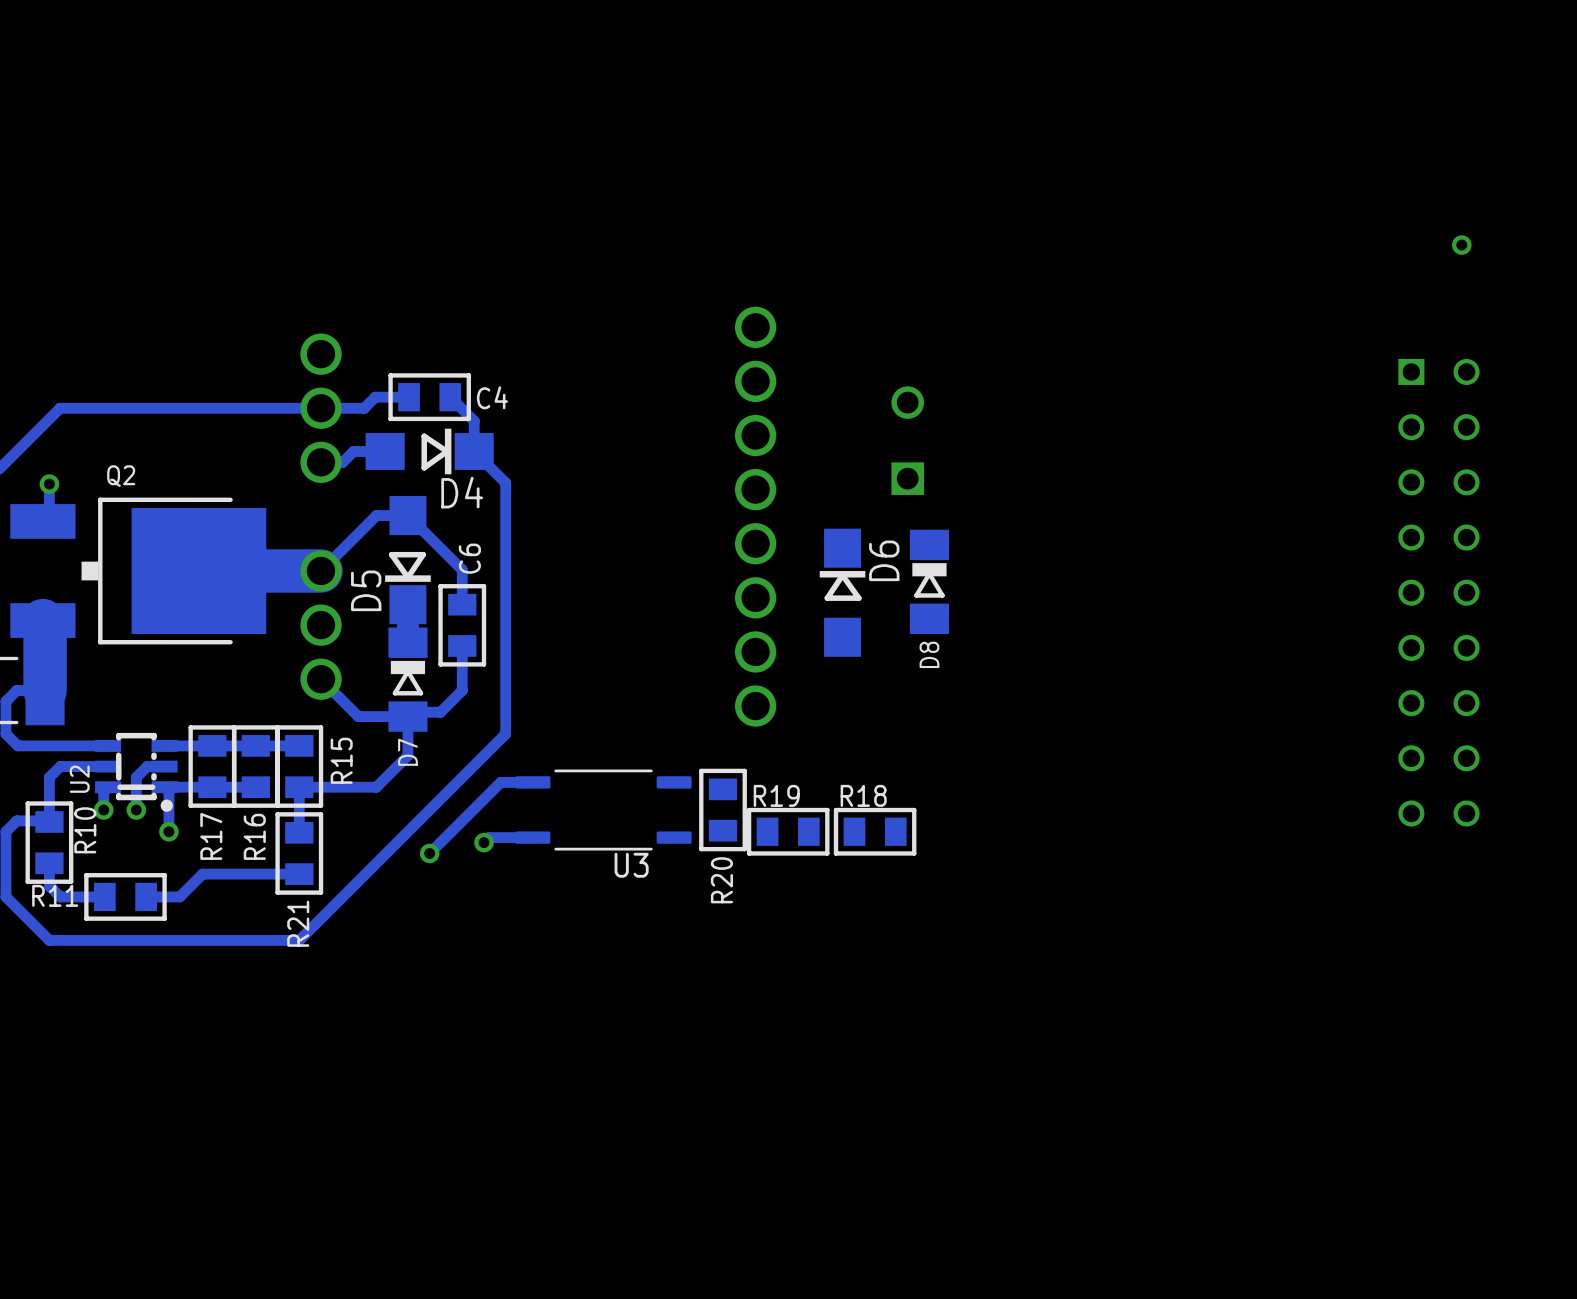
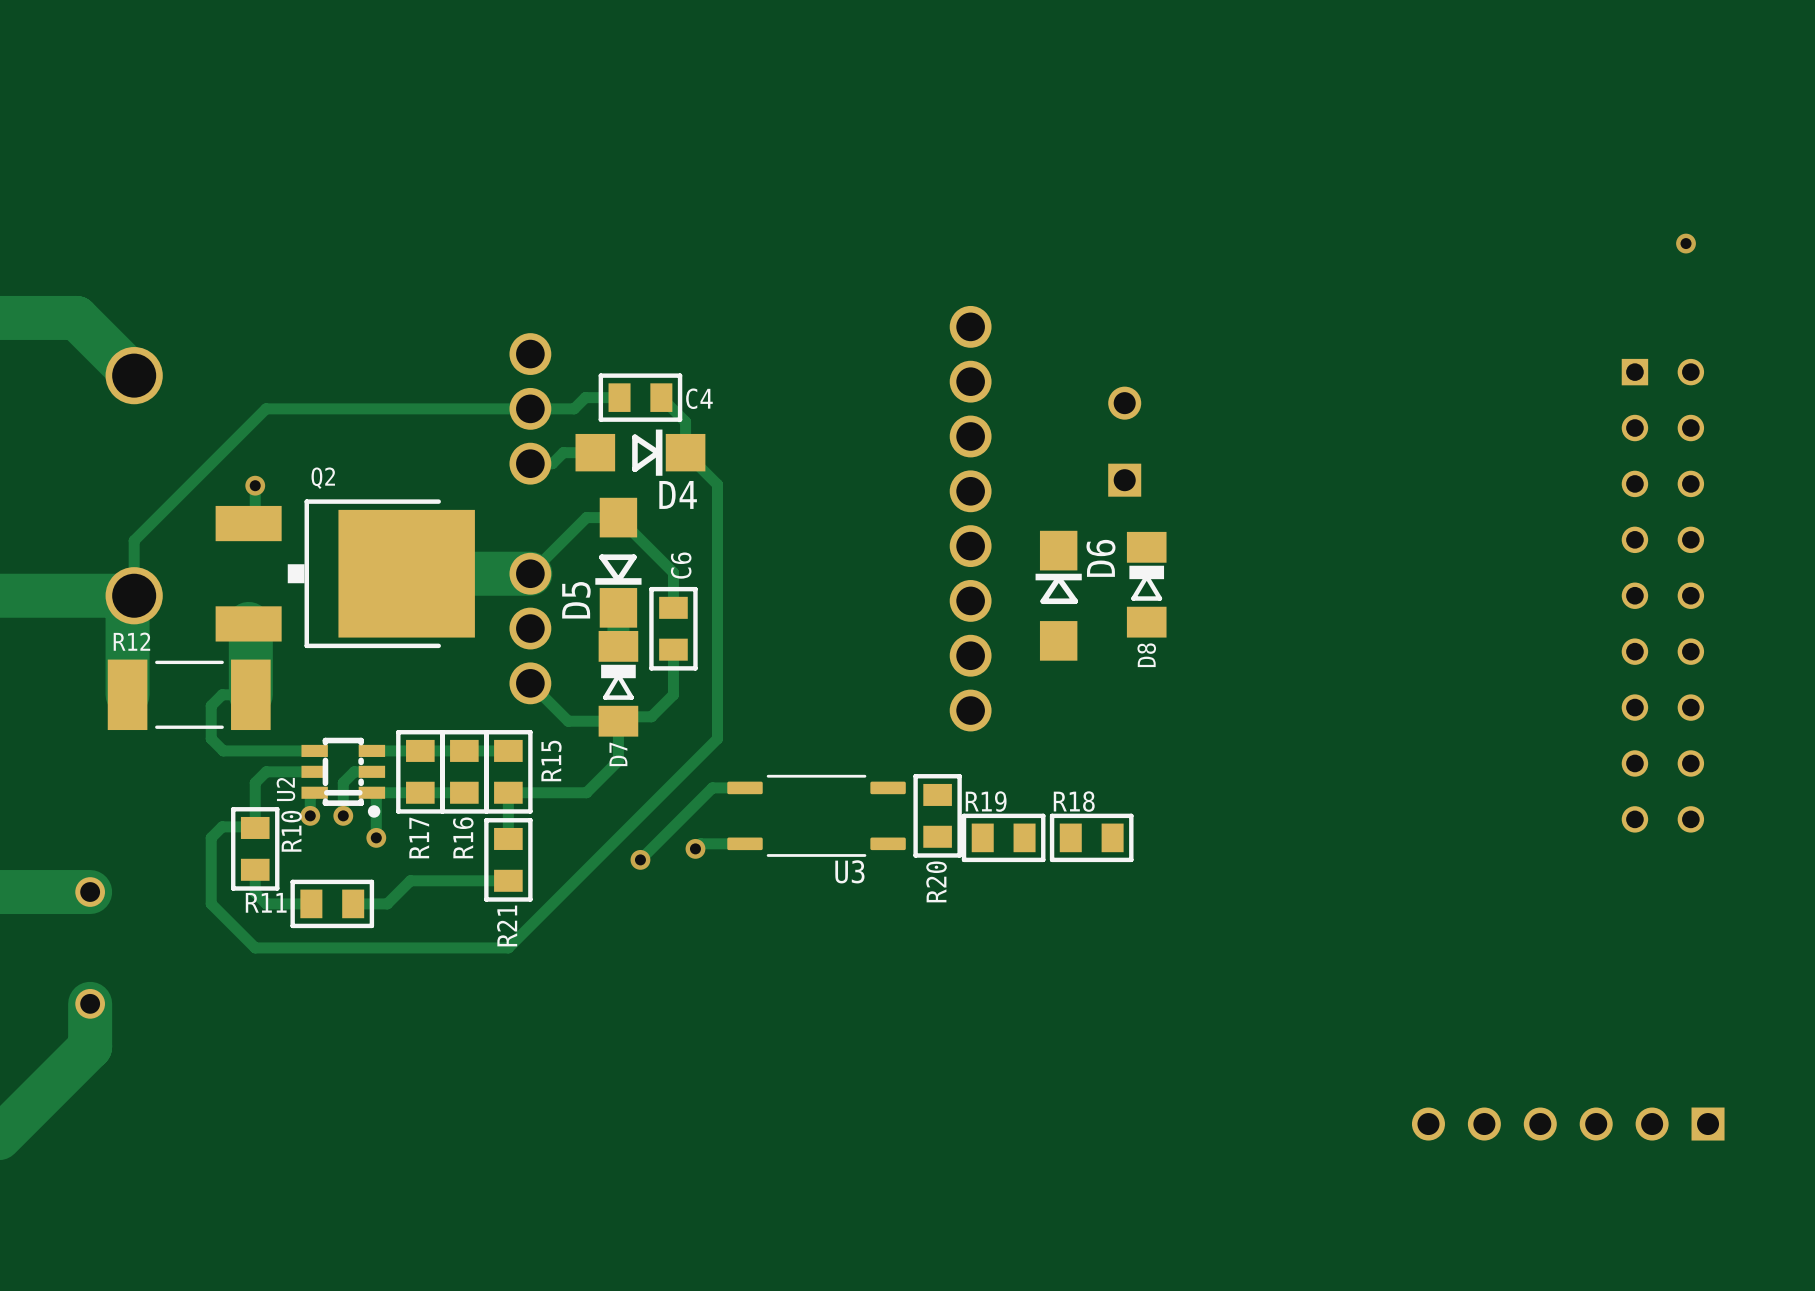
part: none -> (1568, 1124)

